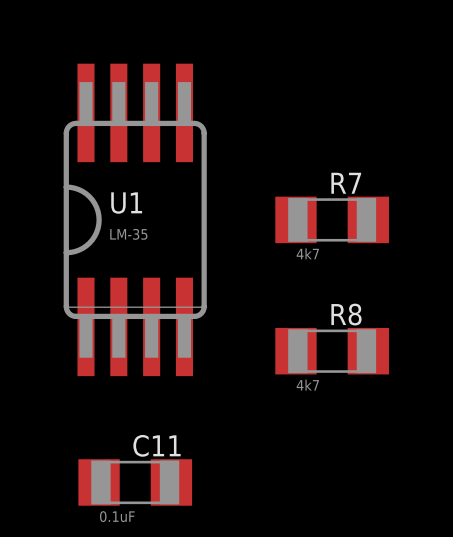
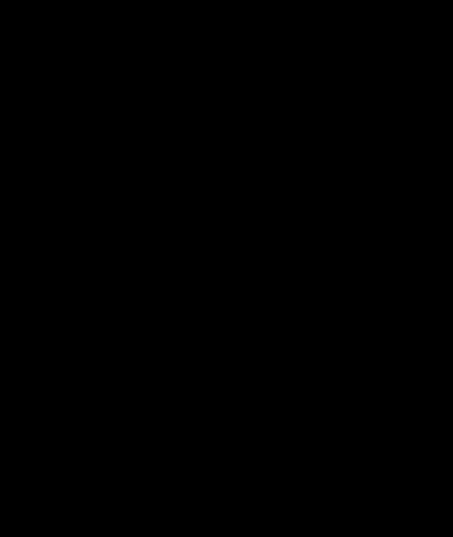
U1: LM-35 (135, 219) -> none
R7: 4k7 (332, 219) -> none
R8: 4k7 (332, 351) -> none
C11: 0.1uF (135, 482) -> none

